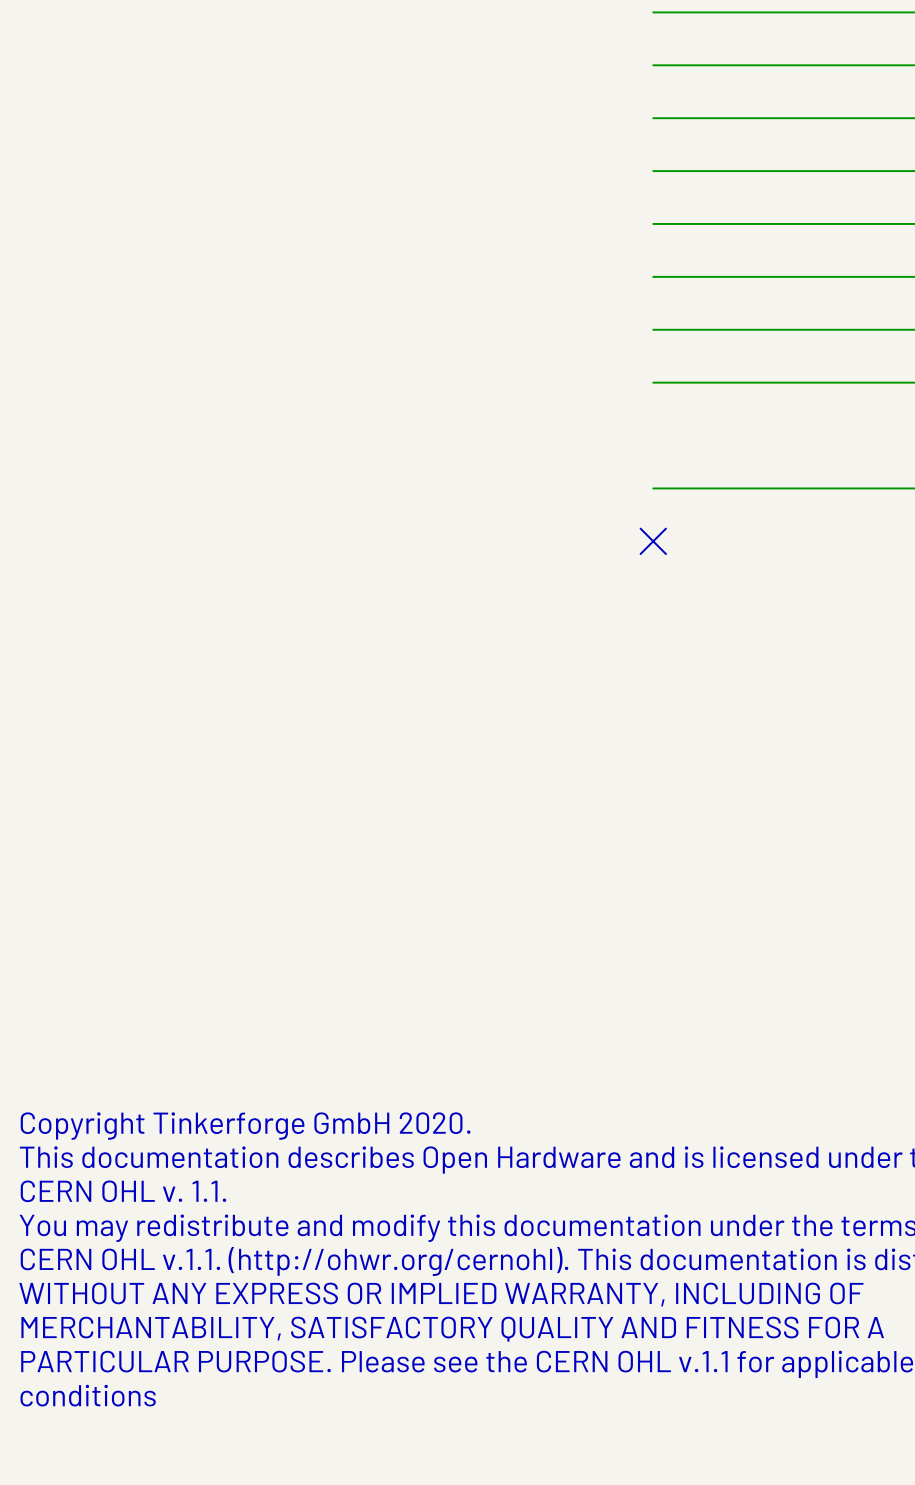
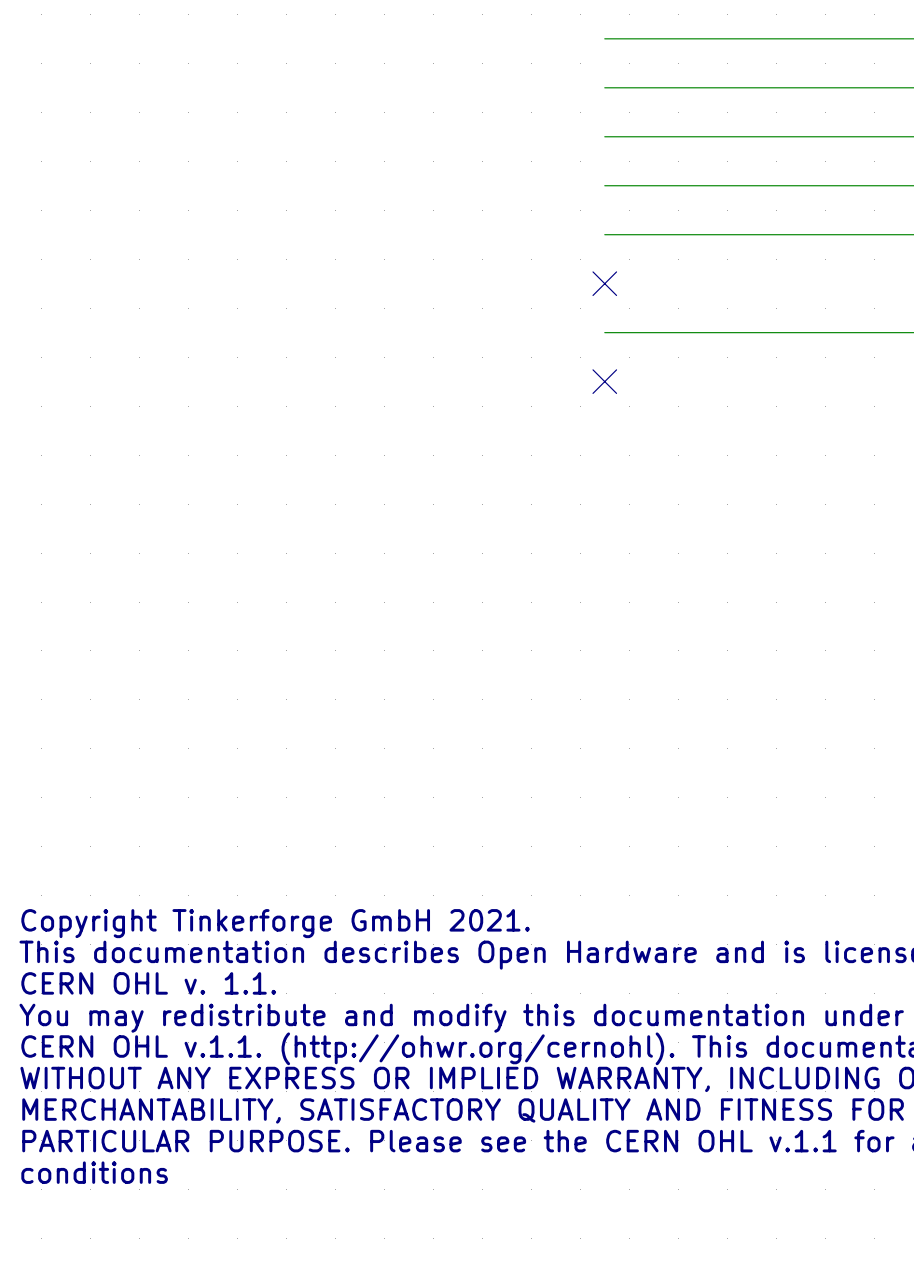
no-connect mark: none -> (604, 283)
text: Copyright Tinkerforge GmbH 2020. (245, 1126) -> Copyright Tinkerforge GmbH 2021. (275, 923)

